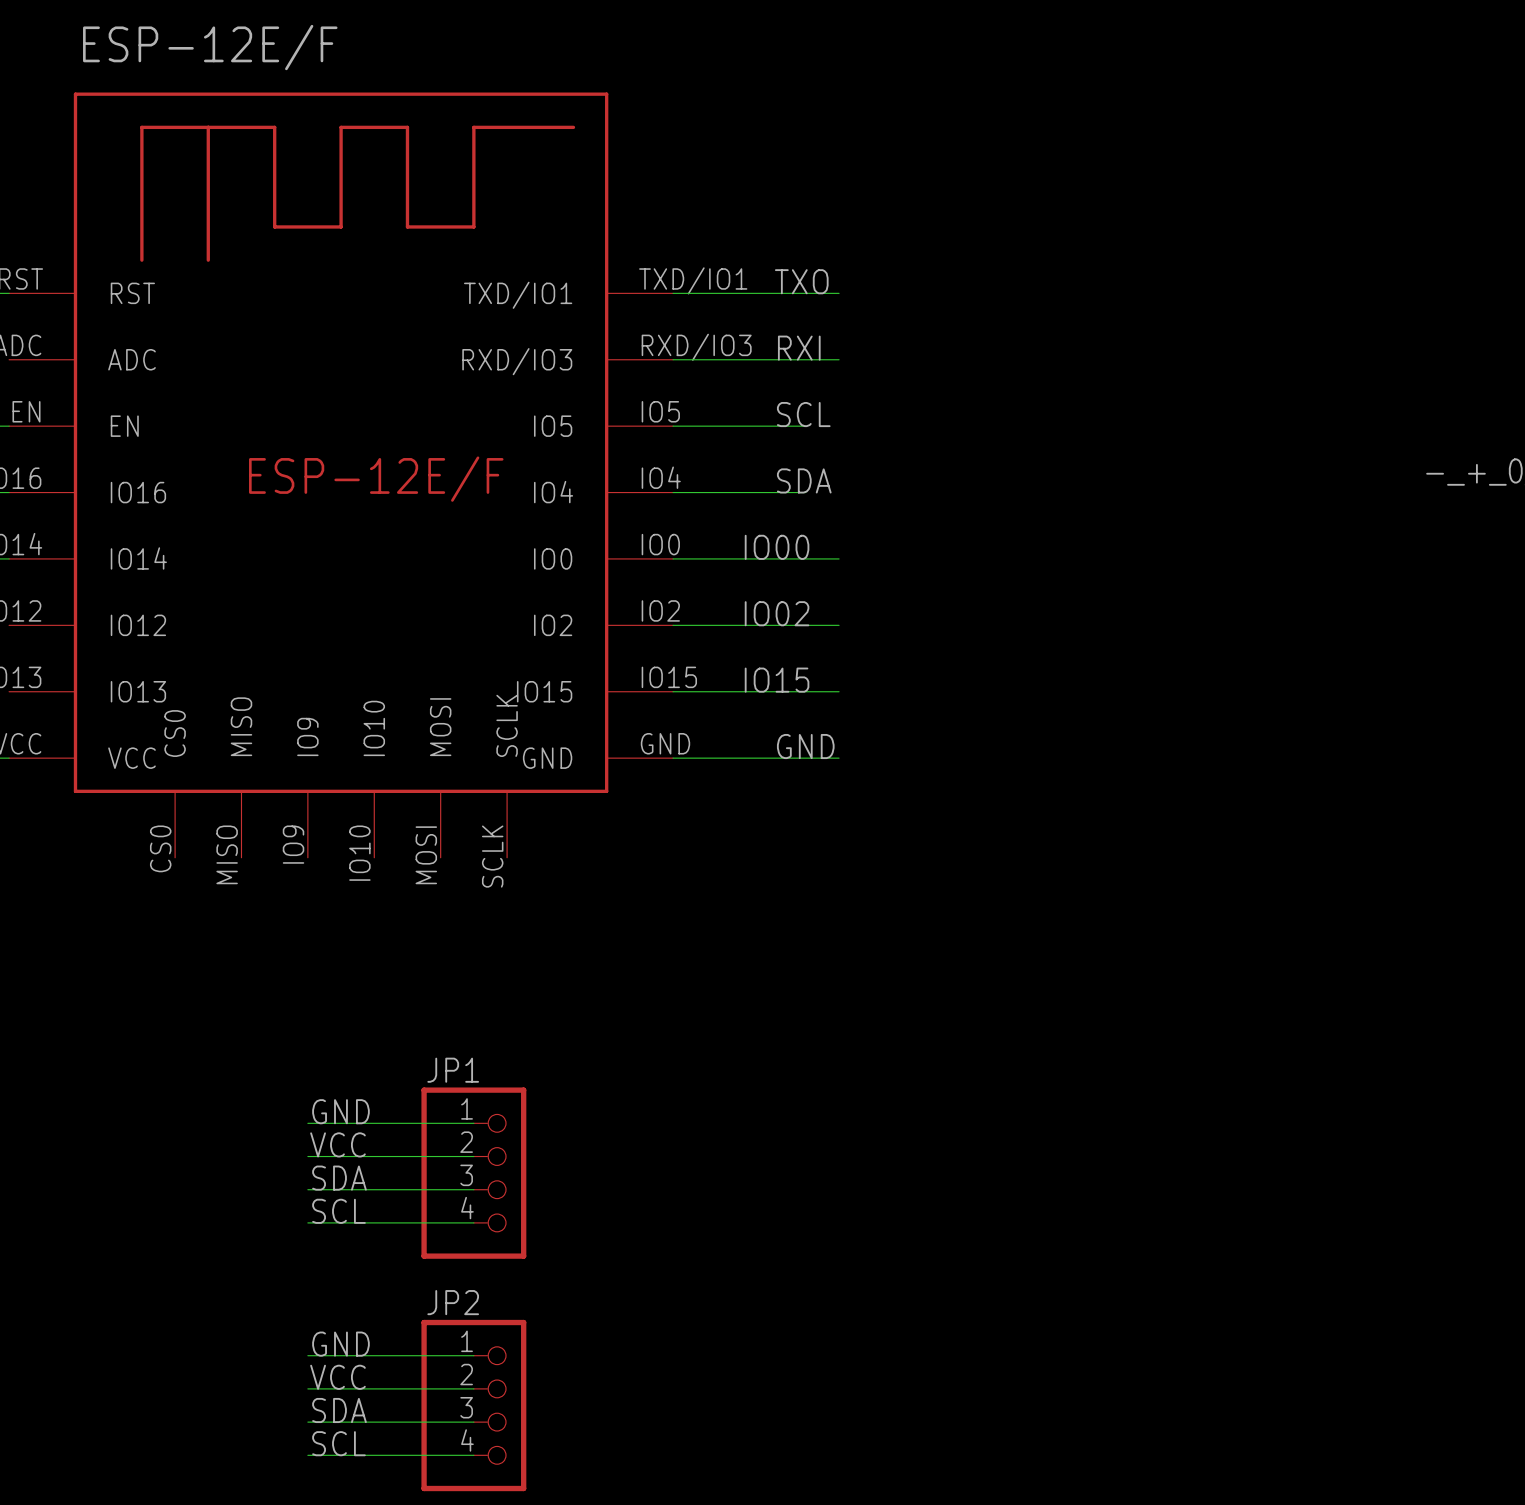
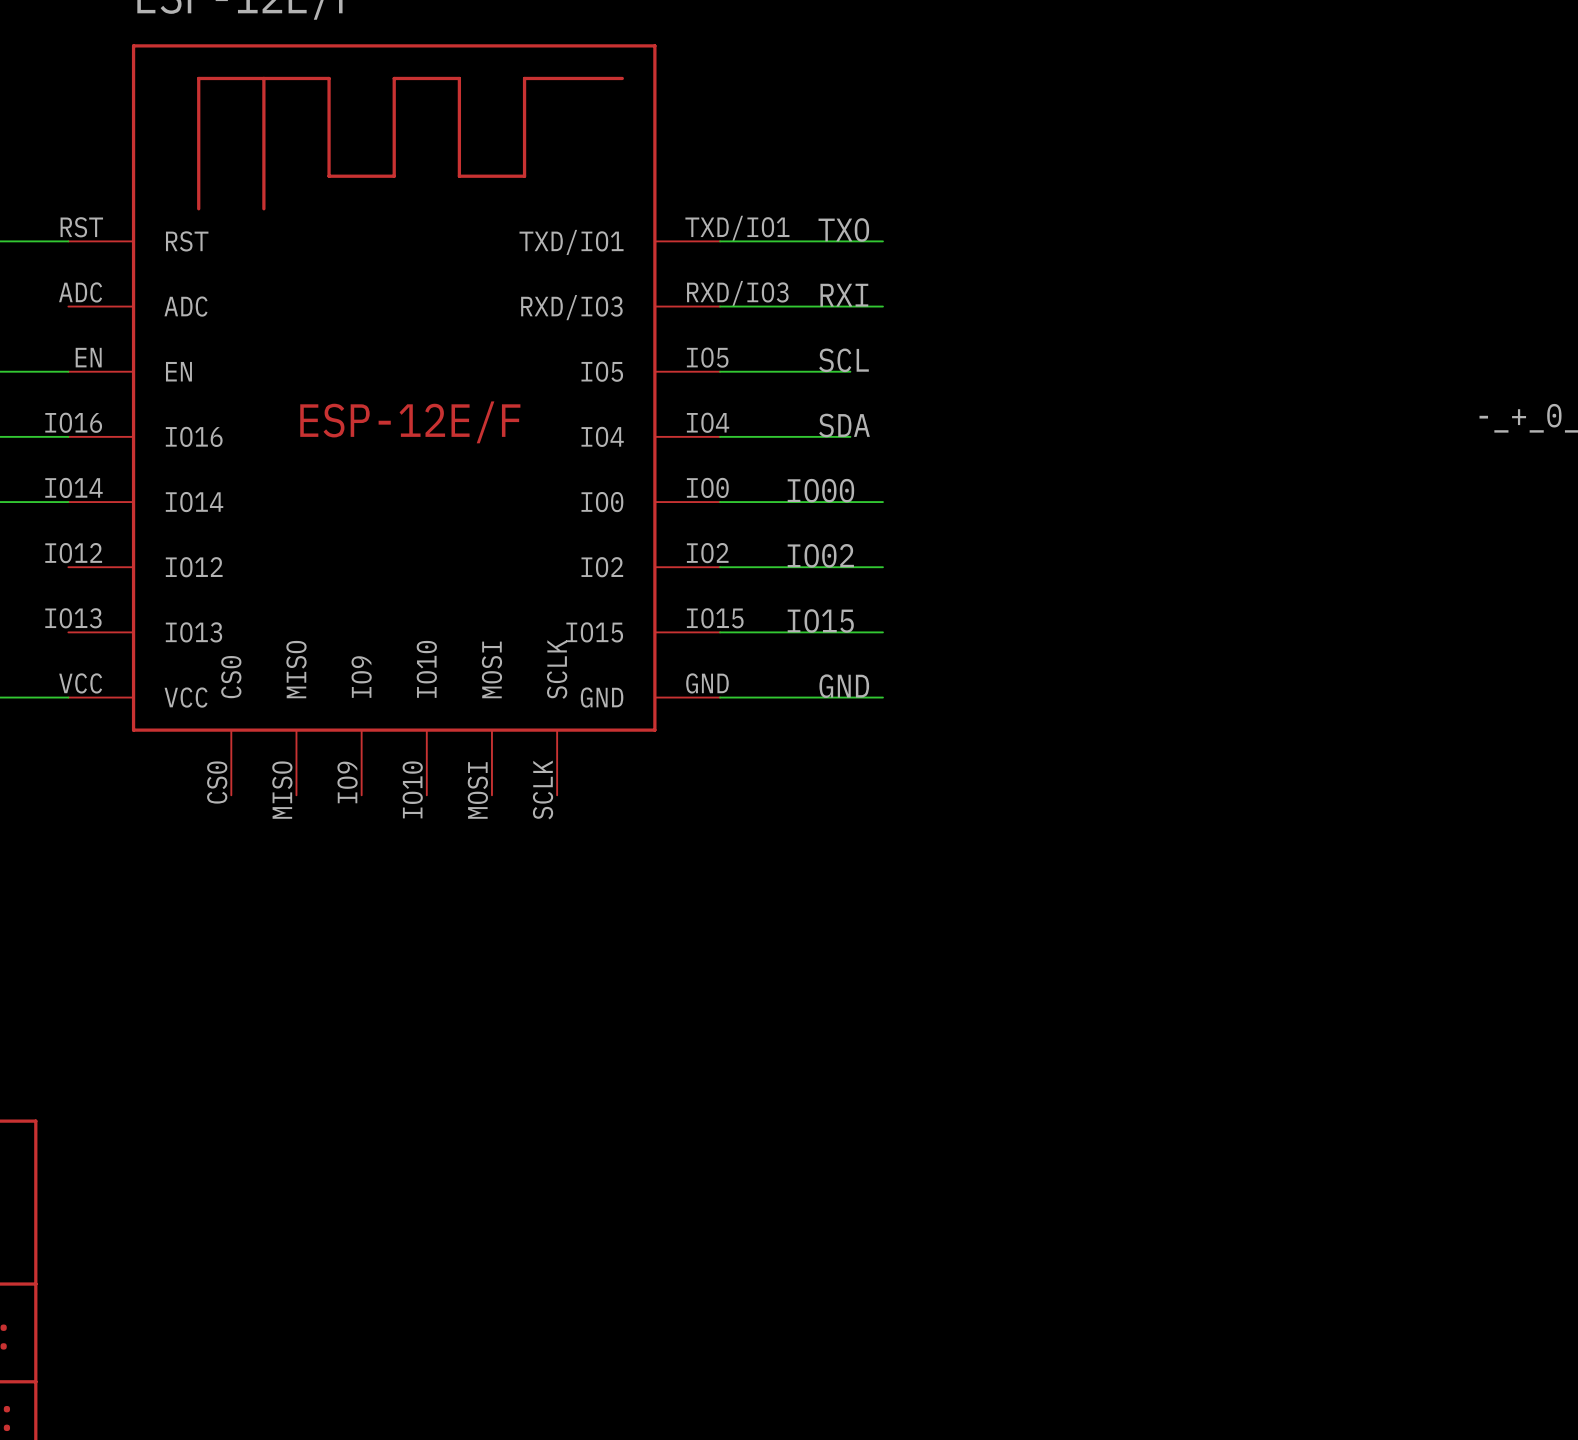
label: GND (340, 1111) -> none
wire: (307, 1123) (473, 1123) -> none
label: VCC (337, 1144) -> none
wire: (307, 1156) (473, 1156) -> none
JP1: (473, 1173) -> none
label: SDA (339, 1178) -> none
wire: (307, 1189) (473, 1189) -> none
label: SCL (338, 1211) -> none
wire: (307, 1222) (473, 1222) -> none
label: GND (340, 1344) -> none
wire: (307, 1355) (473, 1355) -> none
label: VCC (337, 1377) -> none
wire: (307, 1388) (473, 1388) -> none
JP2: (473, 1405) -> none
label: SDA (339, 1410) -> none
wire: (307, 1422) (473, 1422) -> none
label: SCL (338, 1443) -> none
wire: (307, 1455) (473, 1455) -> none

